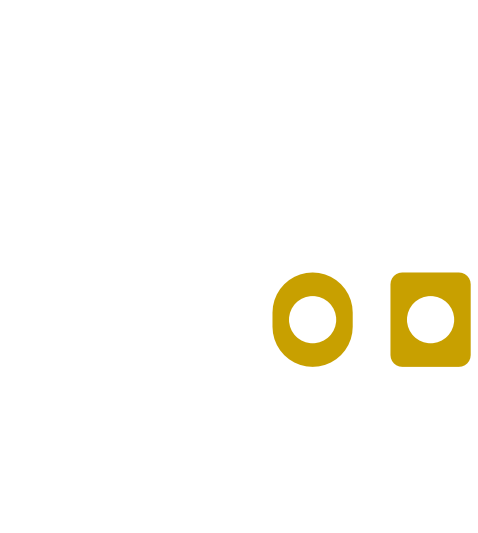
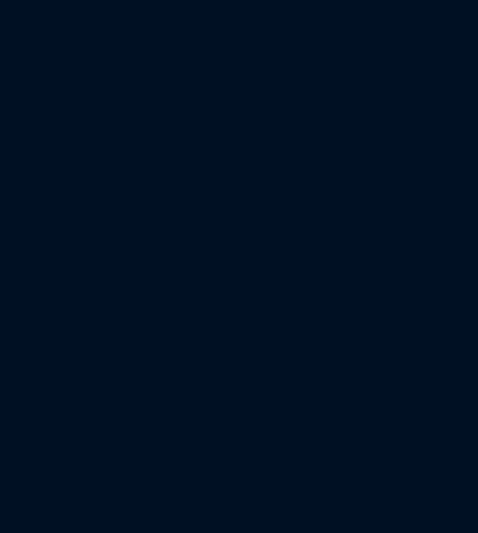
part: (371, 319) -> none

